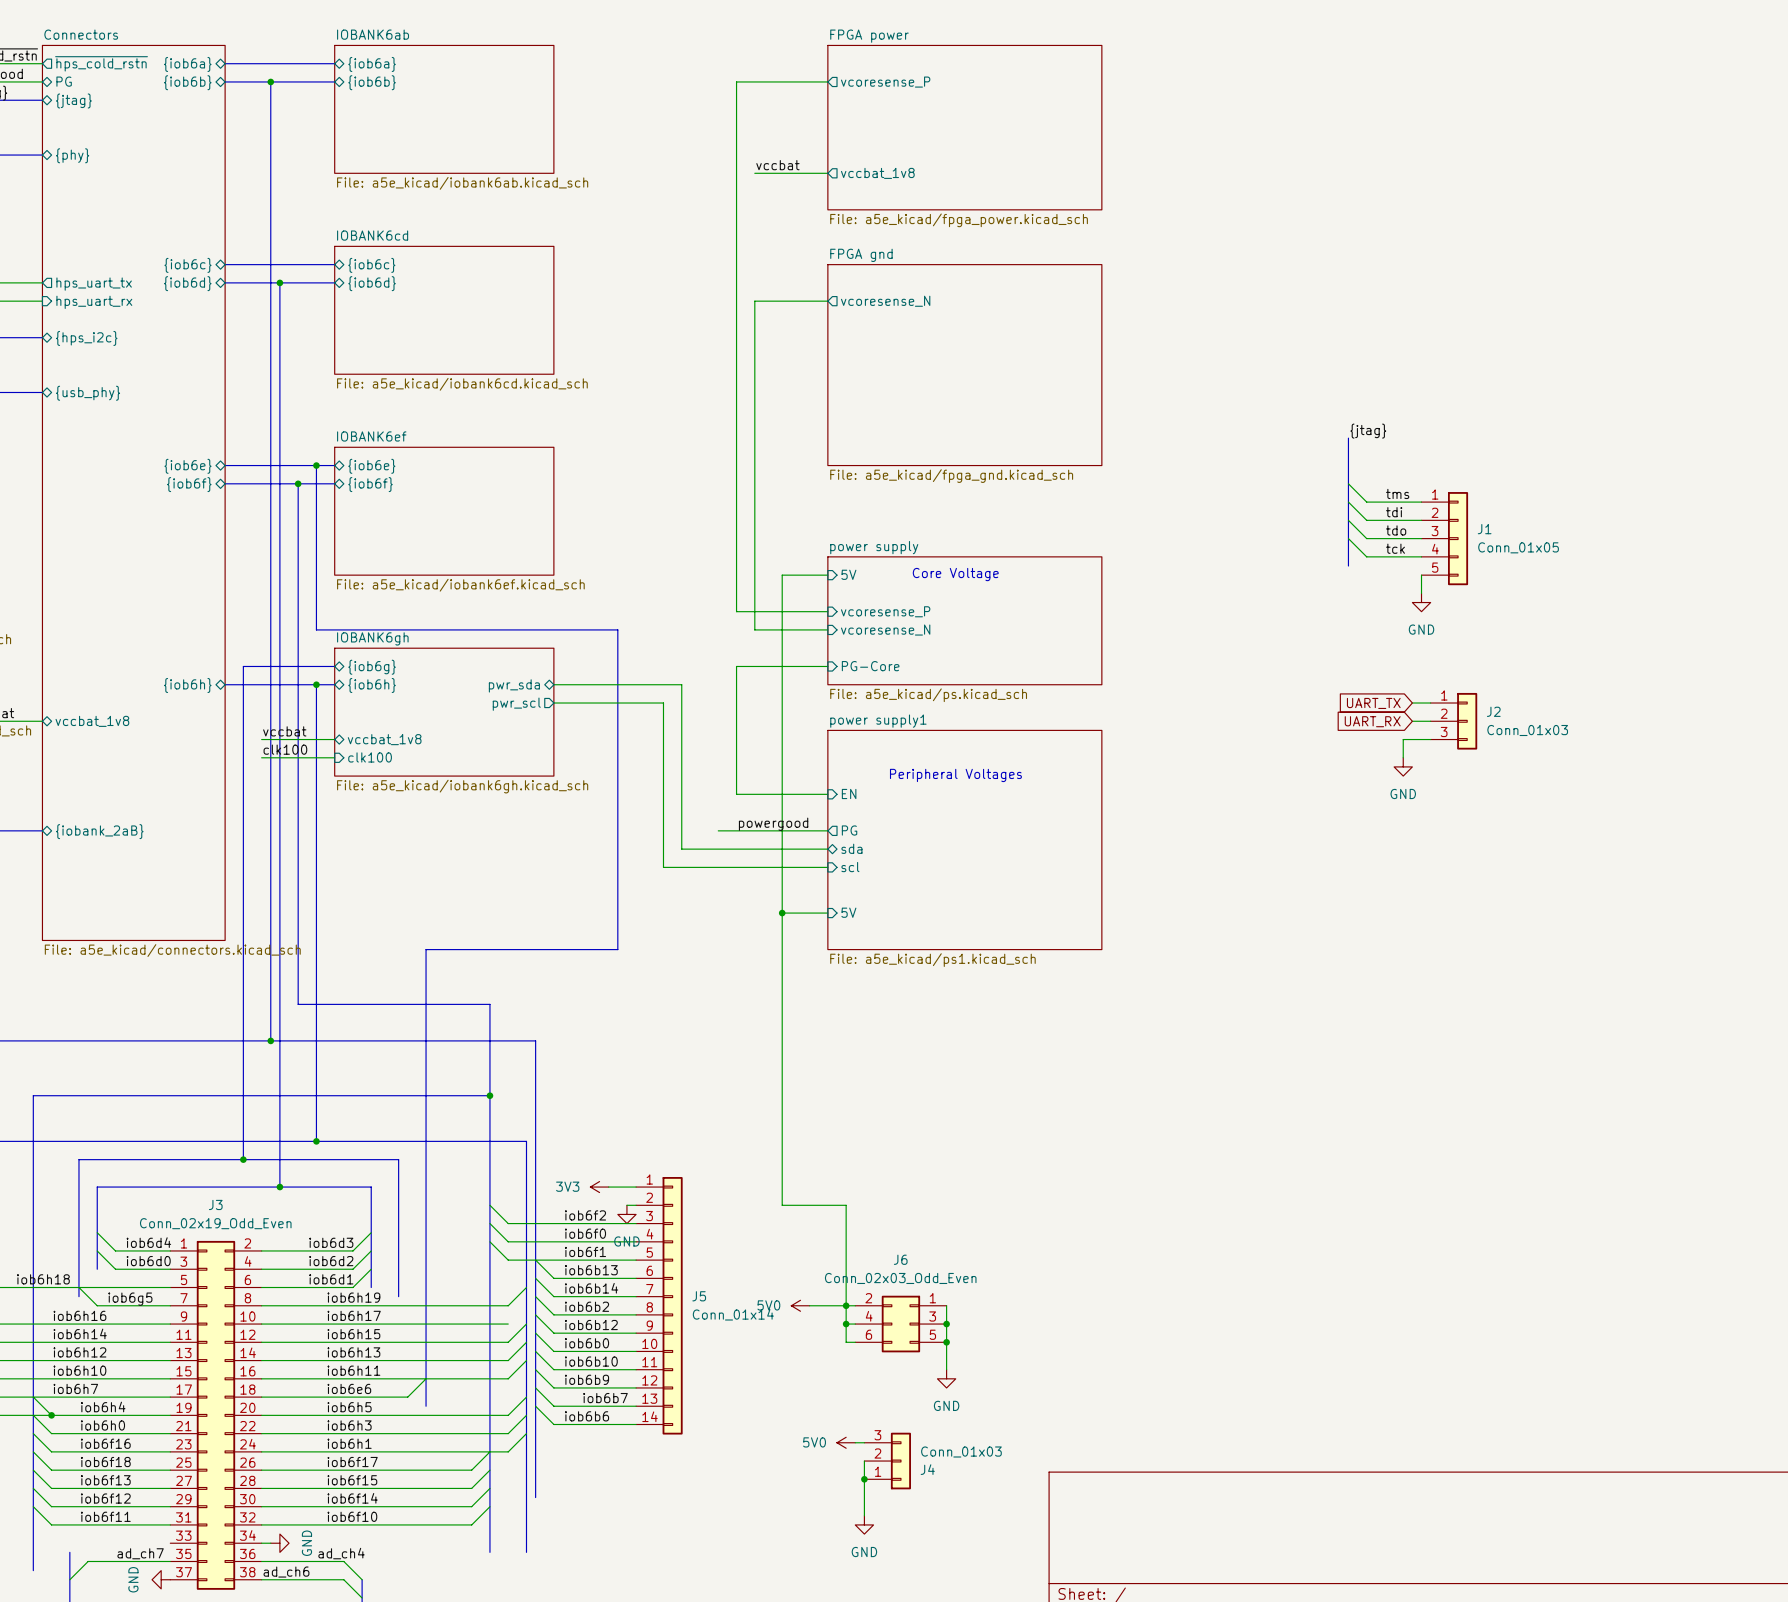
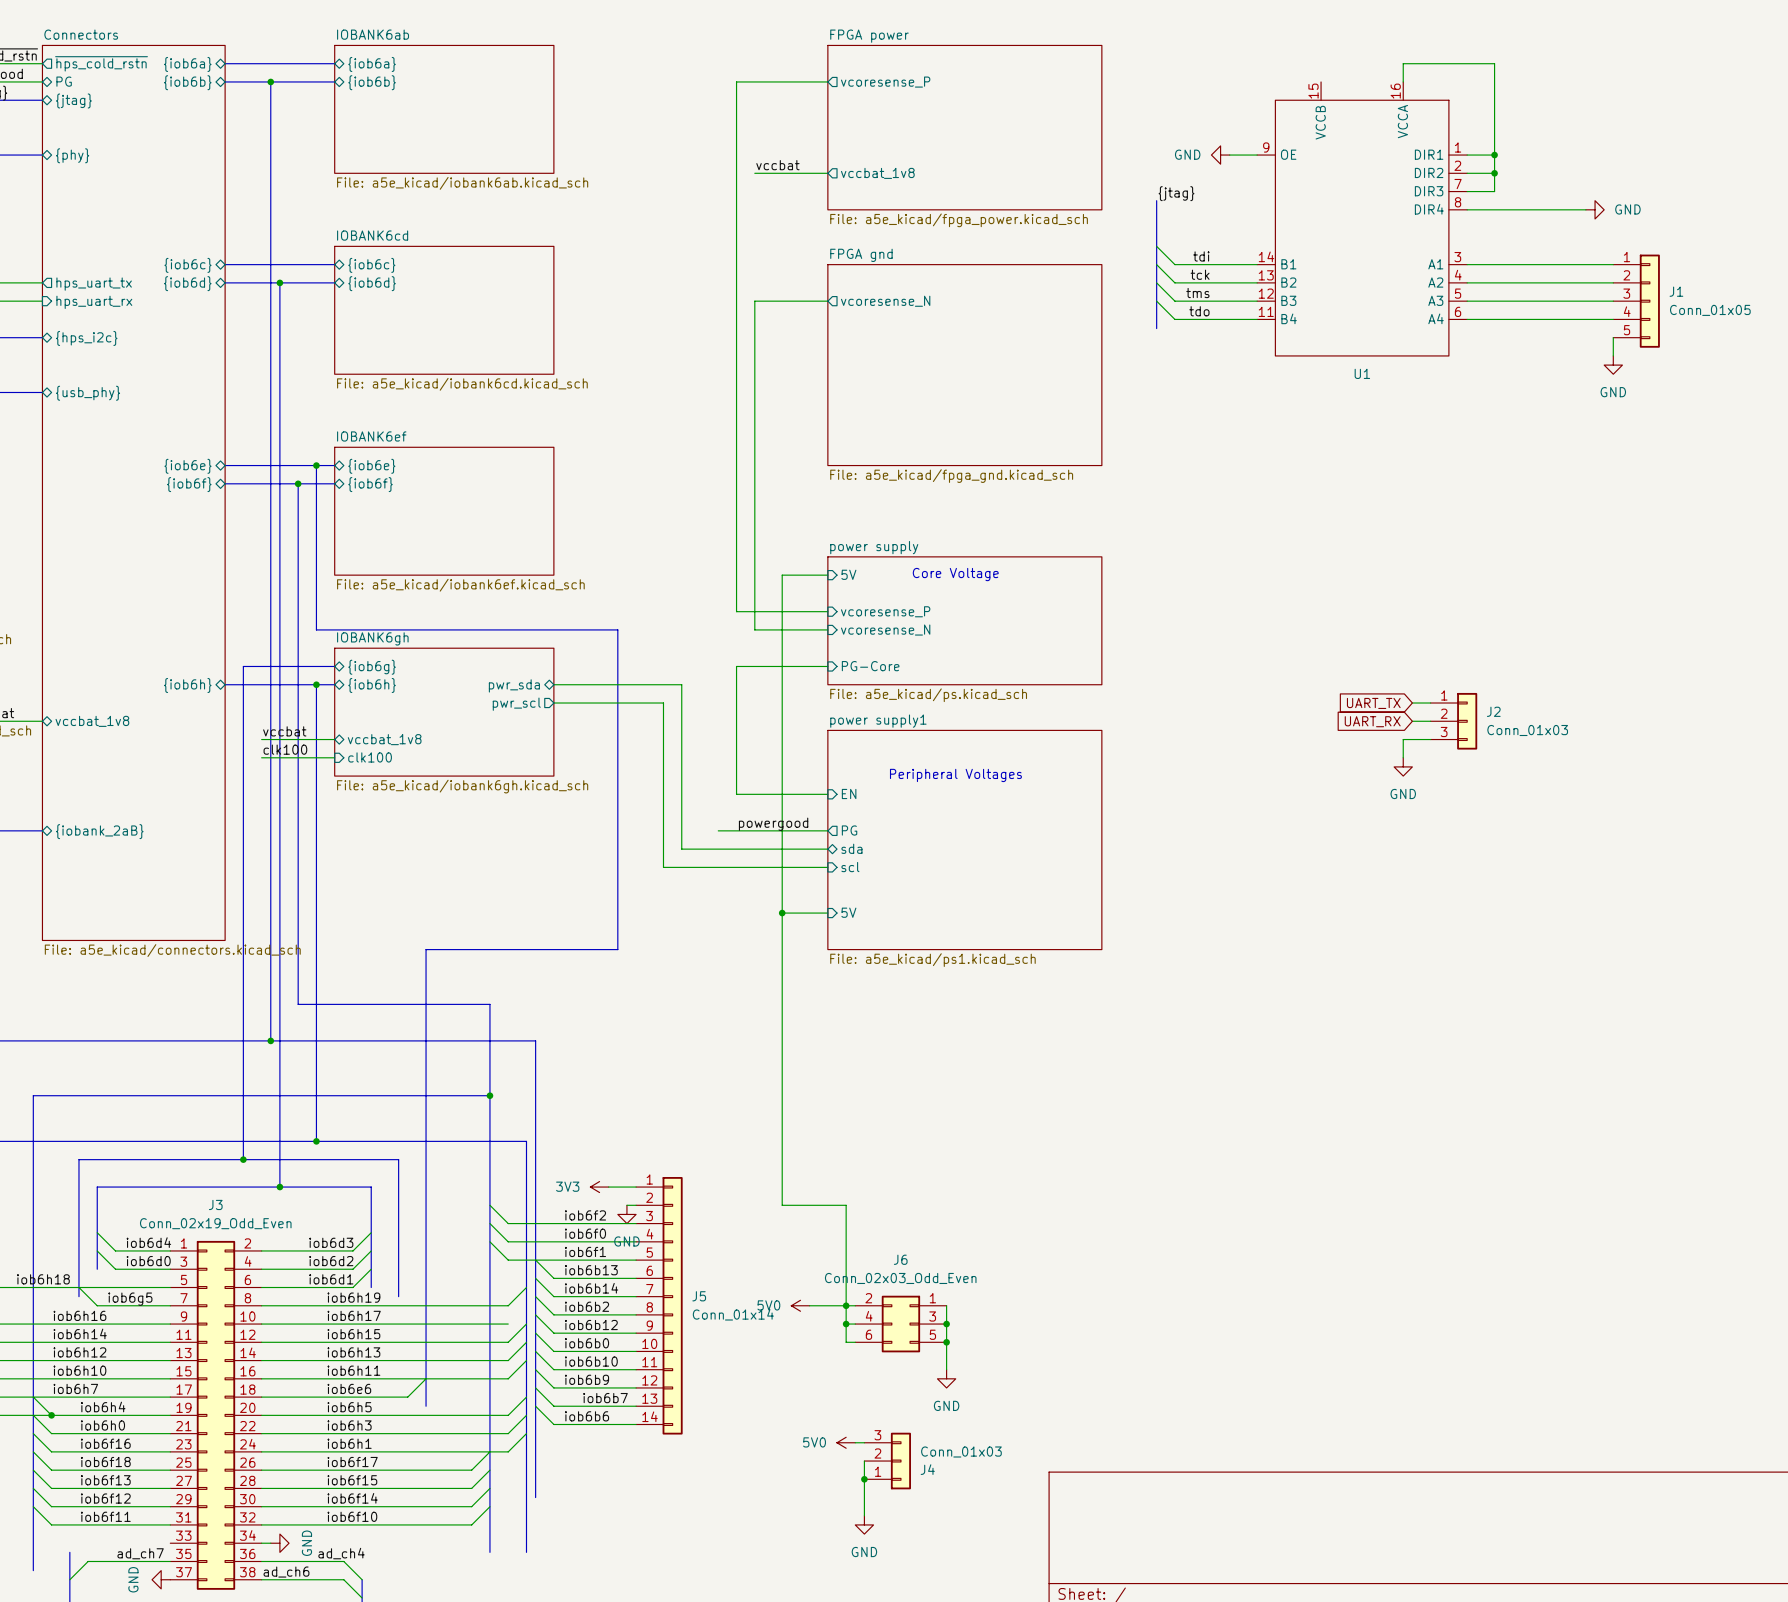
wire: none -> (1403, 81) (1403, 63) (1494, 63) (1494, 191) (1467, 191)
power symbol: none -> GND (1220, 155)
wire: none -> (1229, 155) (1257, 155)
wire: none -> (1467, 155) (1494, 155)
junction: none -> (1494, 155)
wire: none -> (1467, 173) (1494, 173)
junction: none -> (1494, 173)
label: none -> {jtag} (1176, 193)
bus: none -> (1156, 200) (1156, 328)
wire: none -> (1467, 209) (1585, 209)
power symbol: none -> GND (1595, 209)
U1: none -> (1362, 218)
wire: none -> (1156, 246) (1174, 264) (1257, 264)
label: none -> tdi (1201, 256)
wire: none -> (1156, 264) (1174, 282) (1257, 282)
wire: none -> (1467, 264) (1613, 264)
label: none -> tck (1200, 274)
wire: none -> (1156, 282) (1174, 301) (1257, 301)
wire: none -> (1467, 282) (1613, 282)
label: none -> tms (1197, 293)
wire: none -> (1156, 301) (1174, 319) (1257, 319)
wire: none -> (1467, 301) (1613, 301)
label: none -> tdo (1199, 311)
wire: none -> (1467, 319) (1613, 319)
wire: none -> (1613, 337) (1613, 355)
power symbol: none -> GND (1613, 365)
label: {jtag} (1368, 431) -> none
bus: (1348, 438) (1348, 566) -> none
wire: (1348, 483) (1366, 502) (1421, 502) -> none
label: tms (1397, 493) -> none
wire: (1348, 502) (1366, 520) (1421, 520) -> none
label: tdi (1394, 512) -> none
wire: (1348, 520) (1366, 538) (1421, 538) -> none
label: tdo (1396, 530) -> none
wire: (1348, 538) (1366, 556) (1421, 556) -> none
J1 position: (1444, 538) -> (1636, 301)
label: tck (1395, 548) -> none
wire: (1421, 575) (1421, 593) -> none
power symbol: GND (1421, 602) -> none

